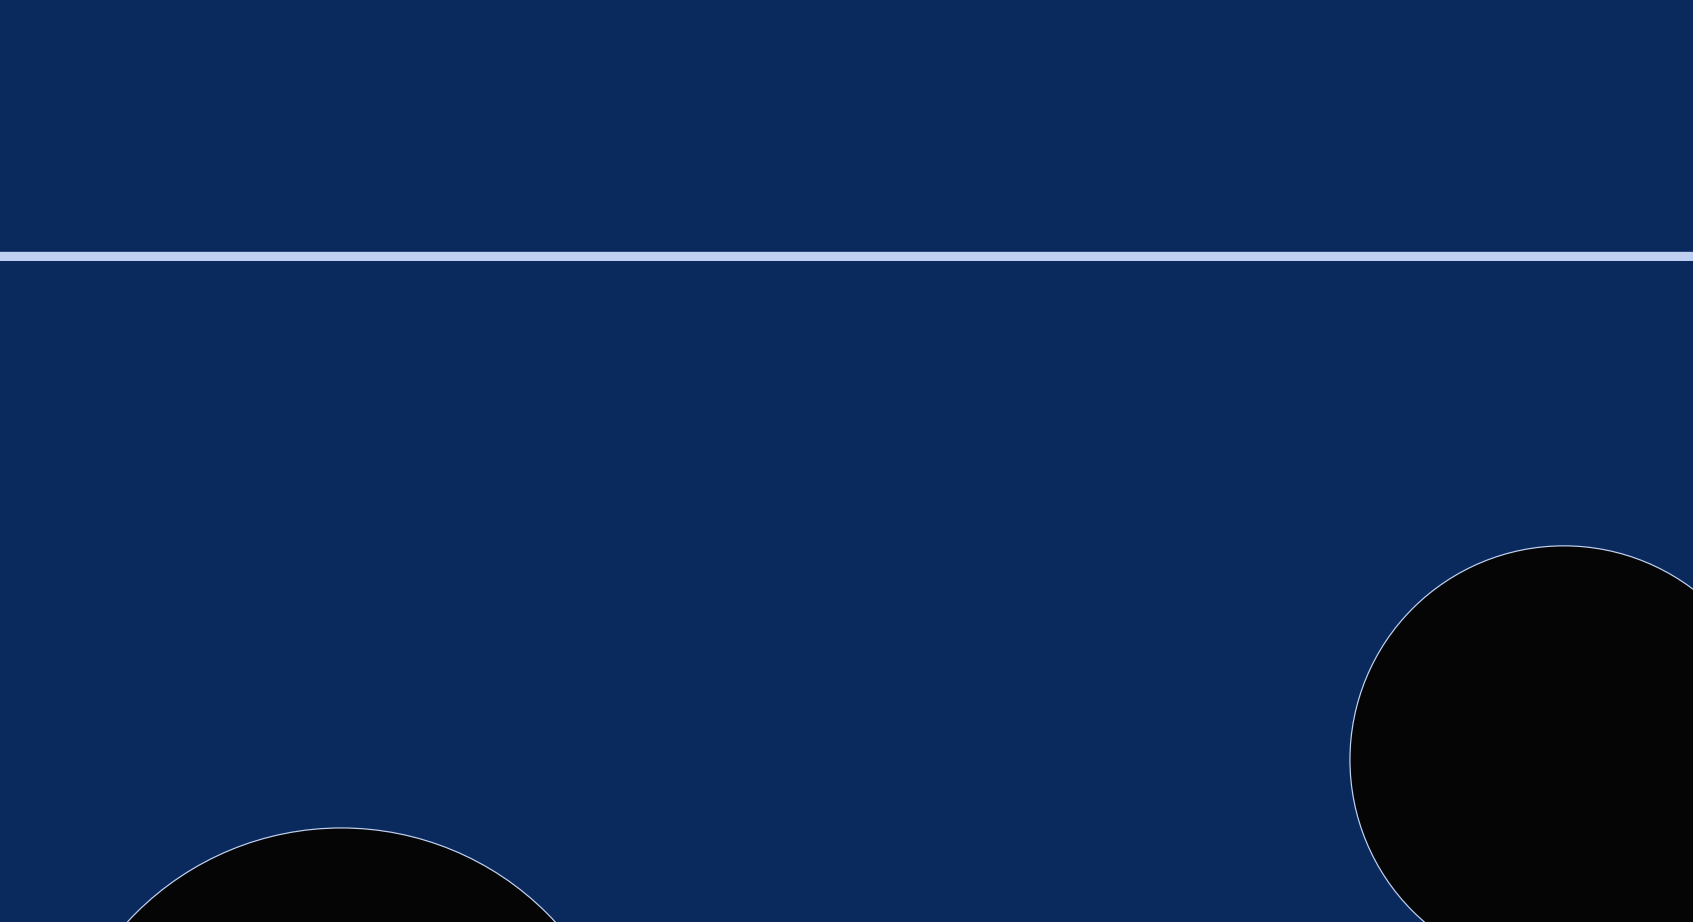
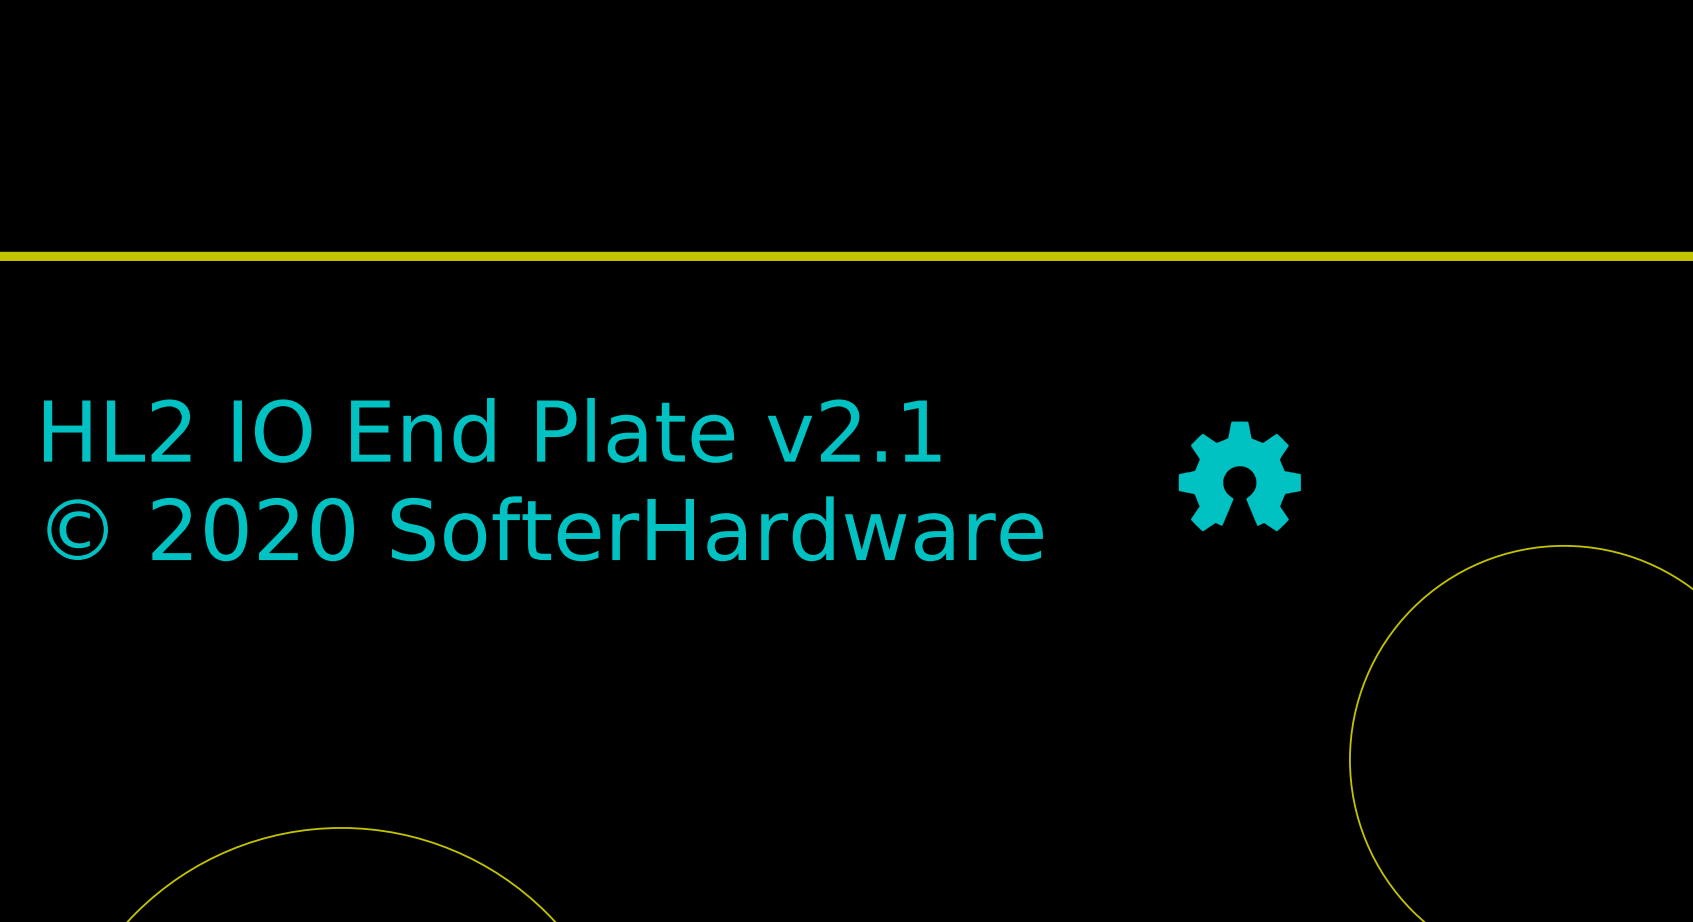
drawing: none -> [1178, 421, 1302, 532]
text: none -> HL2 IO End Plate v2.1 (492, 430)
text: none -> © 2020 SofterHardware (545, 528)

